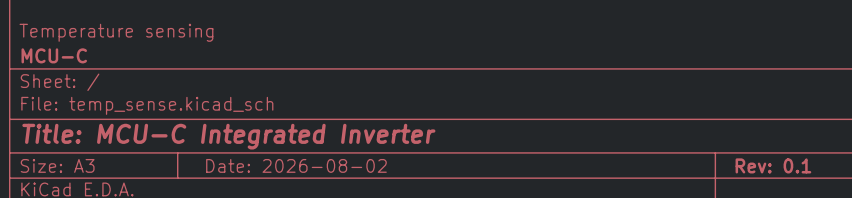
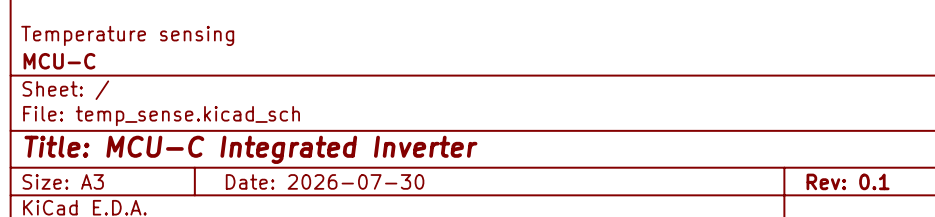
title block: Date: 2026-08-02 (296, 165) -> Date: 2026-07-30 (325, 181)

